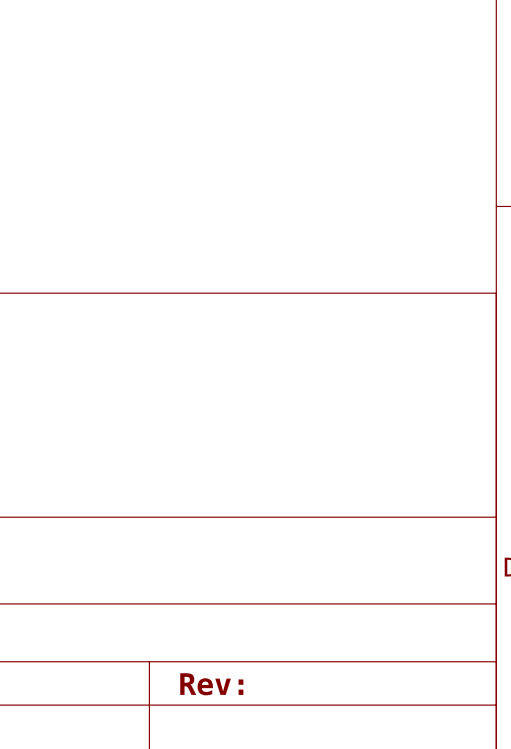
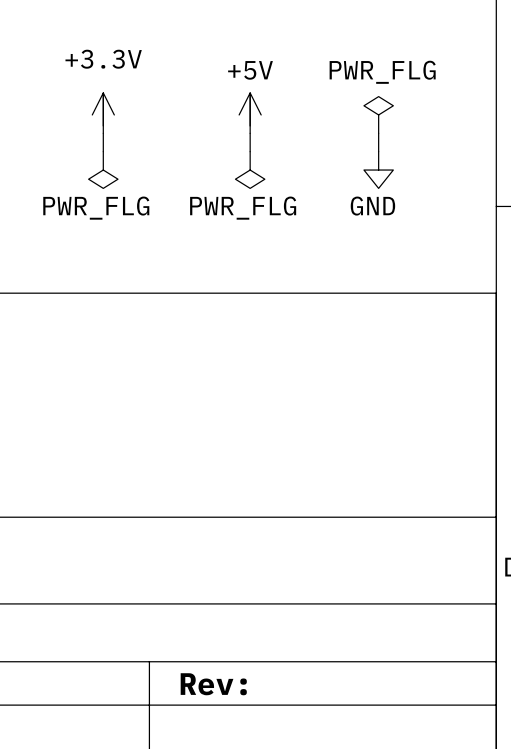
power symbol: none -> +3.3V (103, 113)
power symbol: none -> +5V (250, 113)
power symbol: none -> PWR_FLG (378, 114)
wire: none -> (103, 133) (103, 151)
wire: none -> (250, 133) (250, 151)
wire: none -> (378, 133) (378, 151)
power symbol: none -> PWR_FLG (103, 170)
power symbol: none -> PWR_FLG (250, 170)
power symbol: none -> GND (378, 170)

